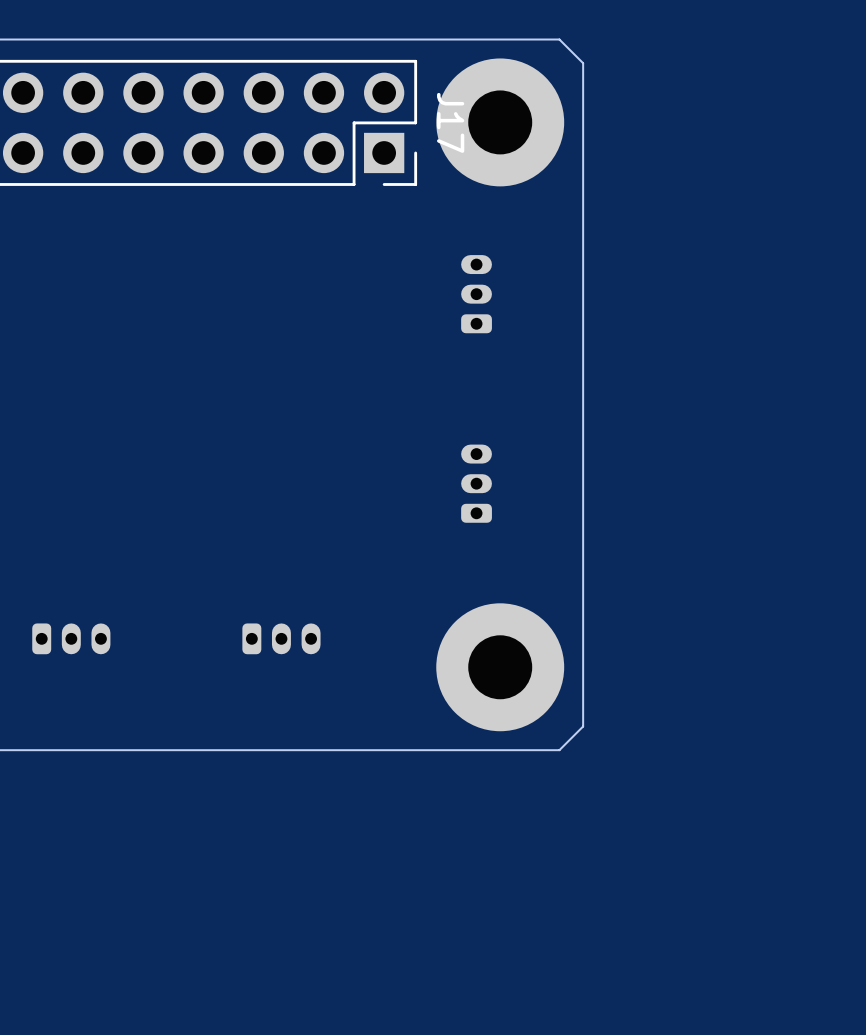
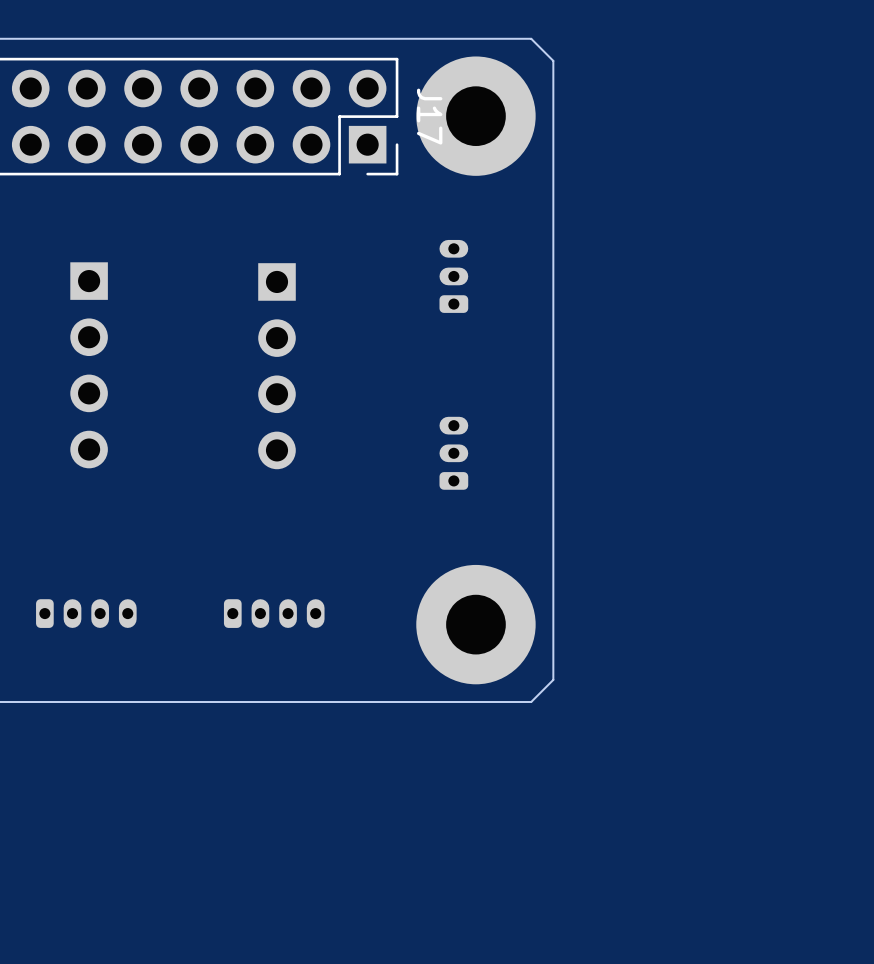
part: none -> (89, 365)
part: none -> (277, 366)
part footprint: [32, 623, 111, 655] -> [36, 599, 137, 628]
part footprint: [242, 623, 321, 655] -> [223, 599, 325, 628]

